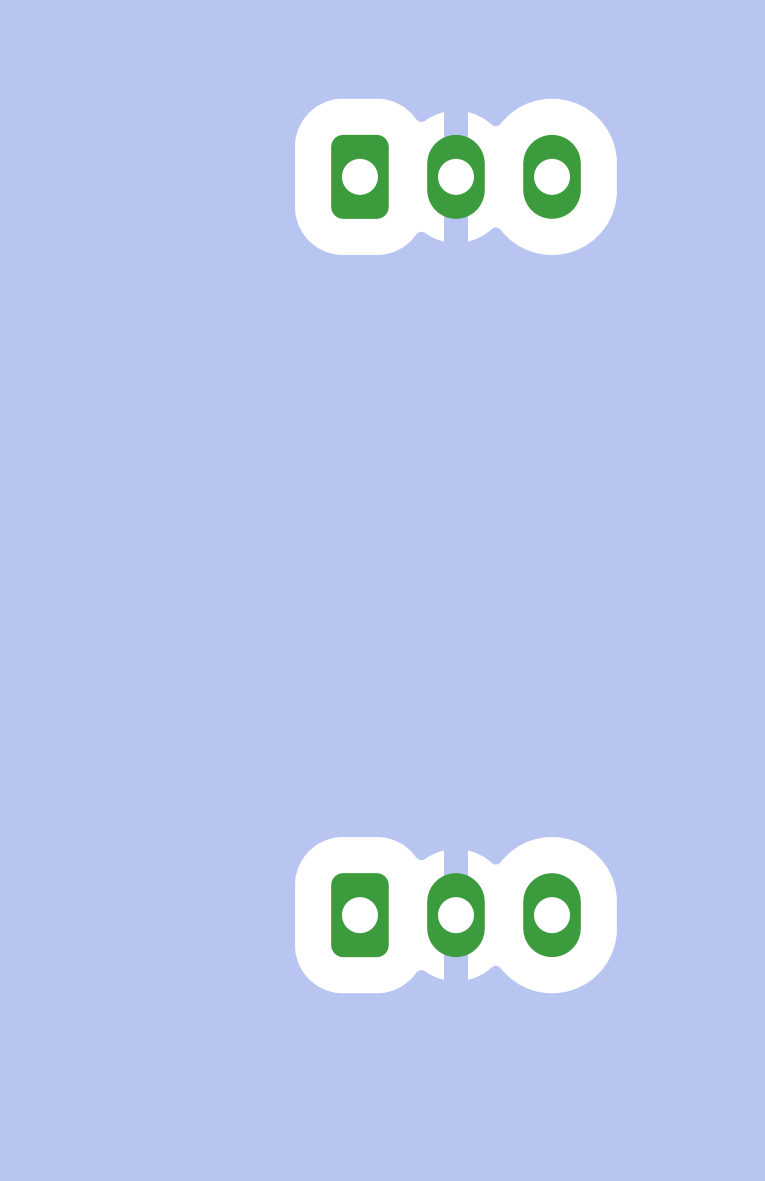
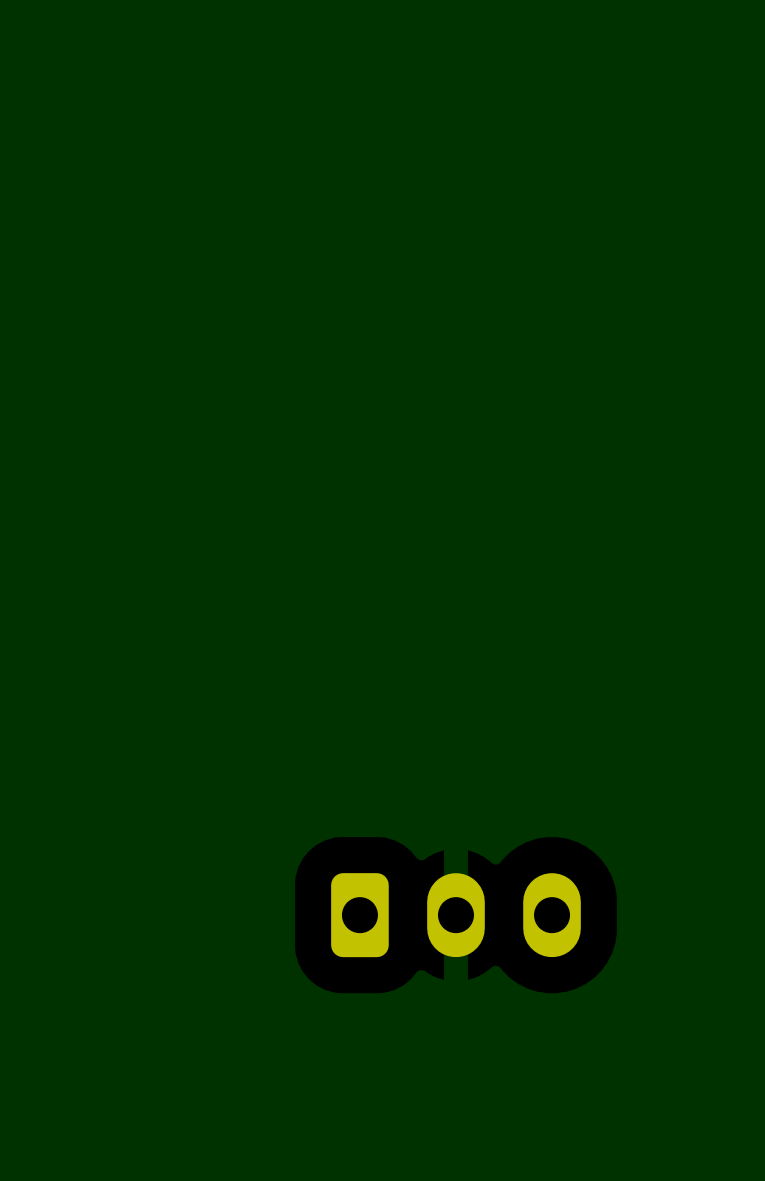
part: (455, 176) -> none

